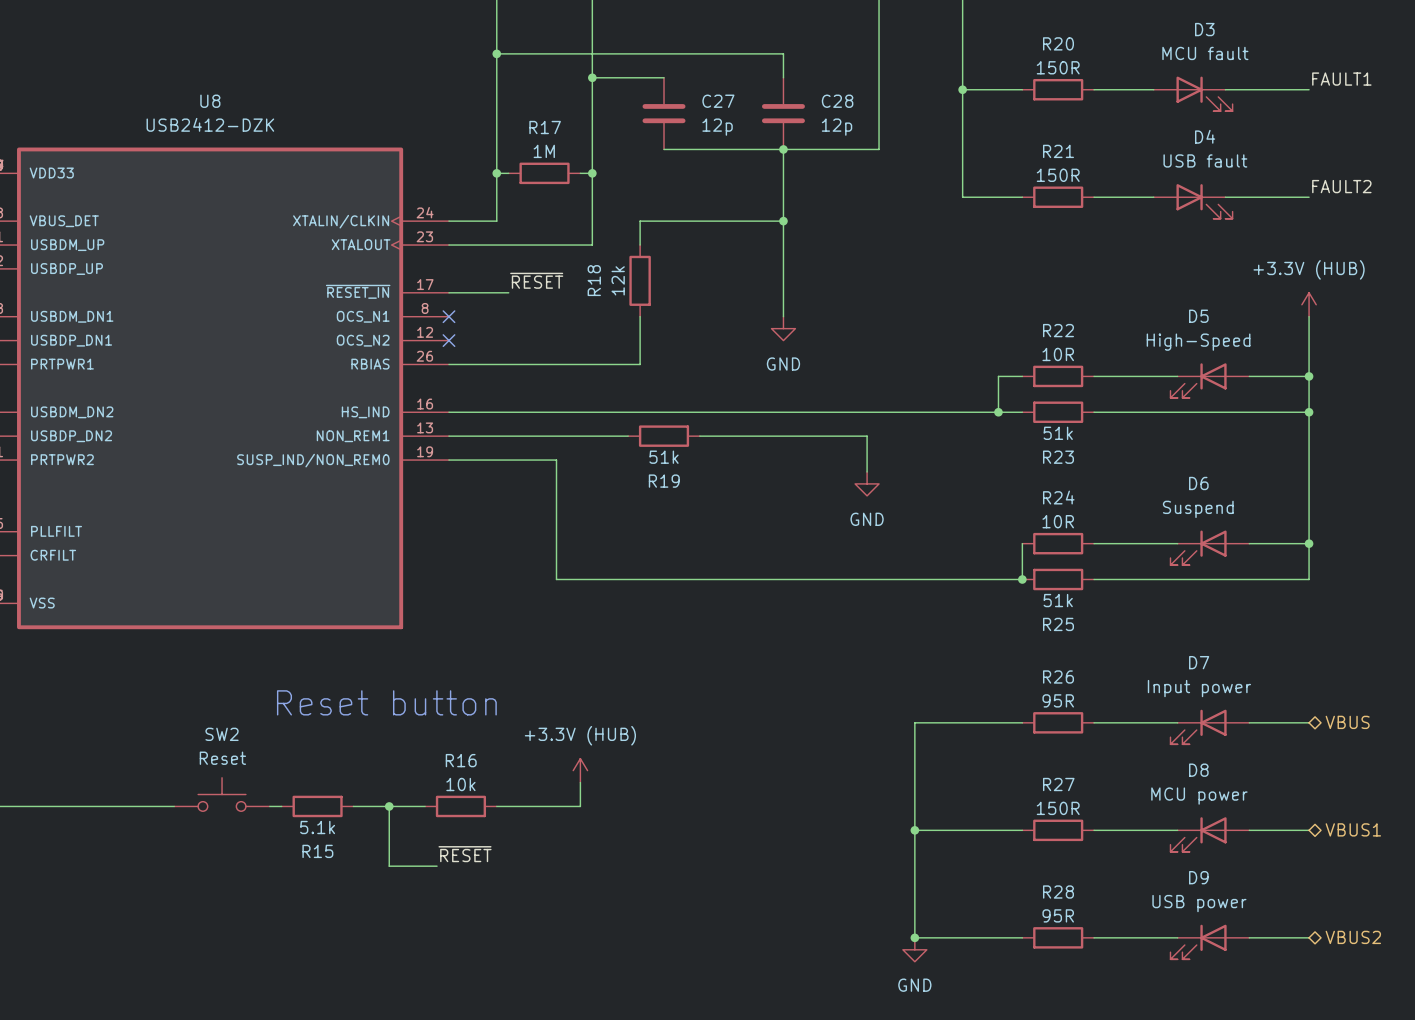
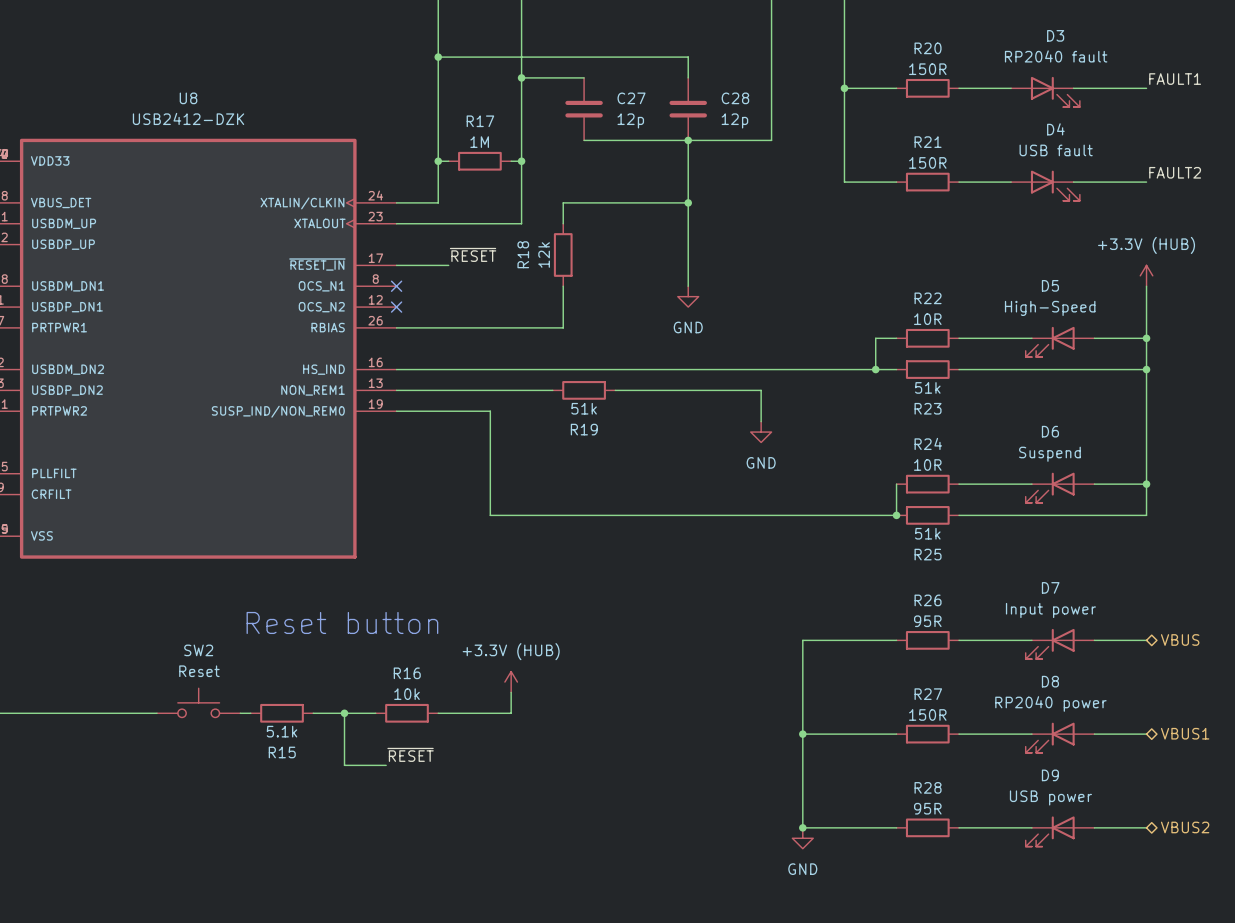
D3 value: MCU fault (1205, 53) -> RP2040 fault (1056, 56)
D8 value: MCU power (1199, 796) -> RP2040 power (1050, 703)

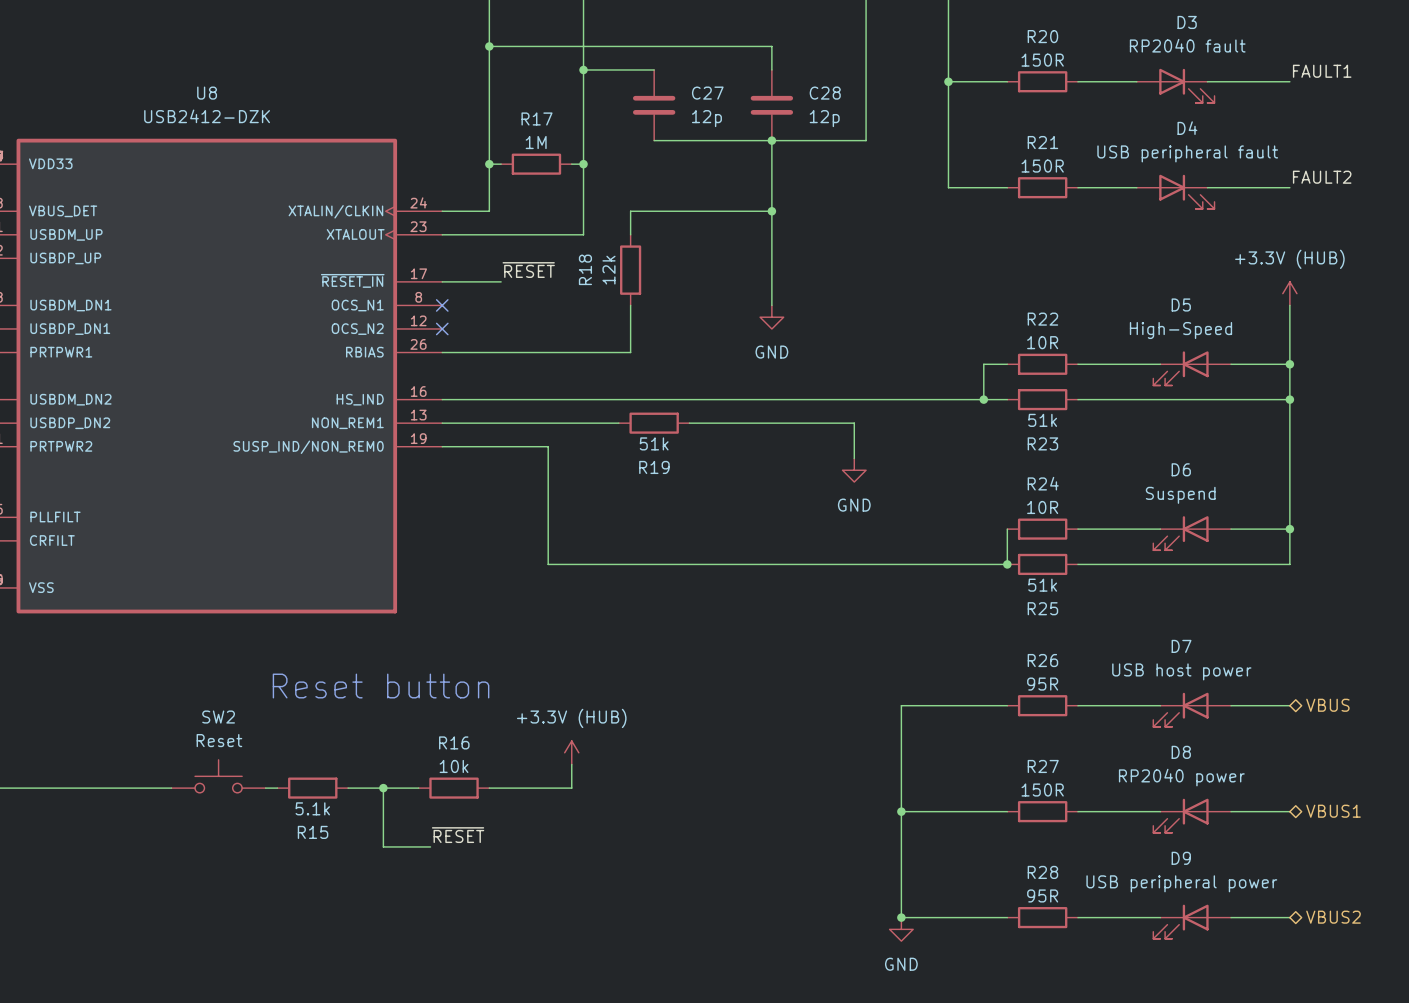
D4 value: USB fault (1056, 150) -> USB peripheral fault (1187, 153)
D7 value: Input power (1050, 610) -> USB host power (1181, 671)
D9 value: USB power (1050, 797) -> USB peripheral power (1181, 883)

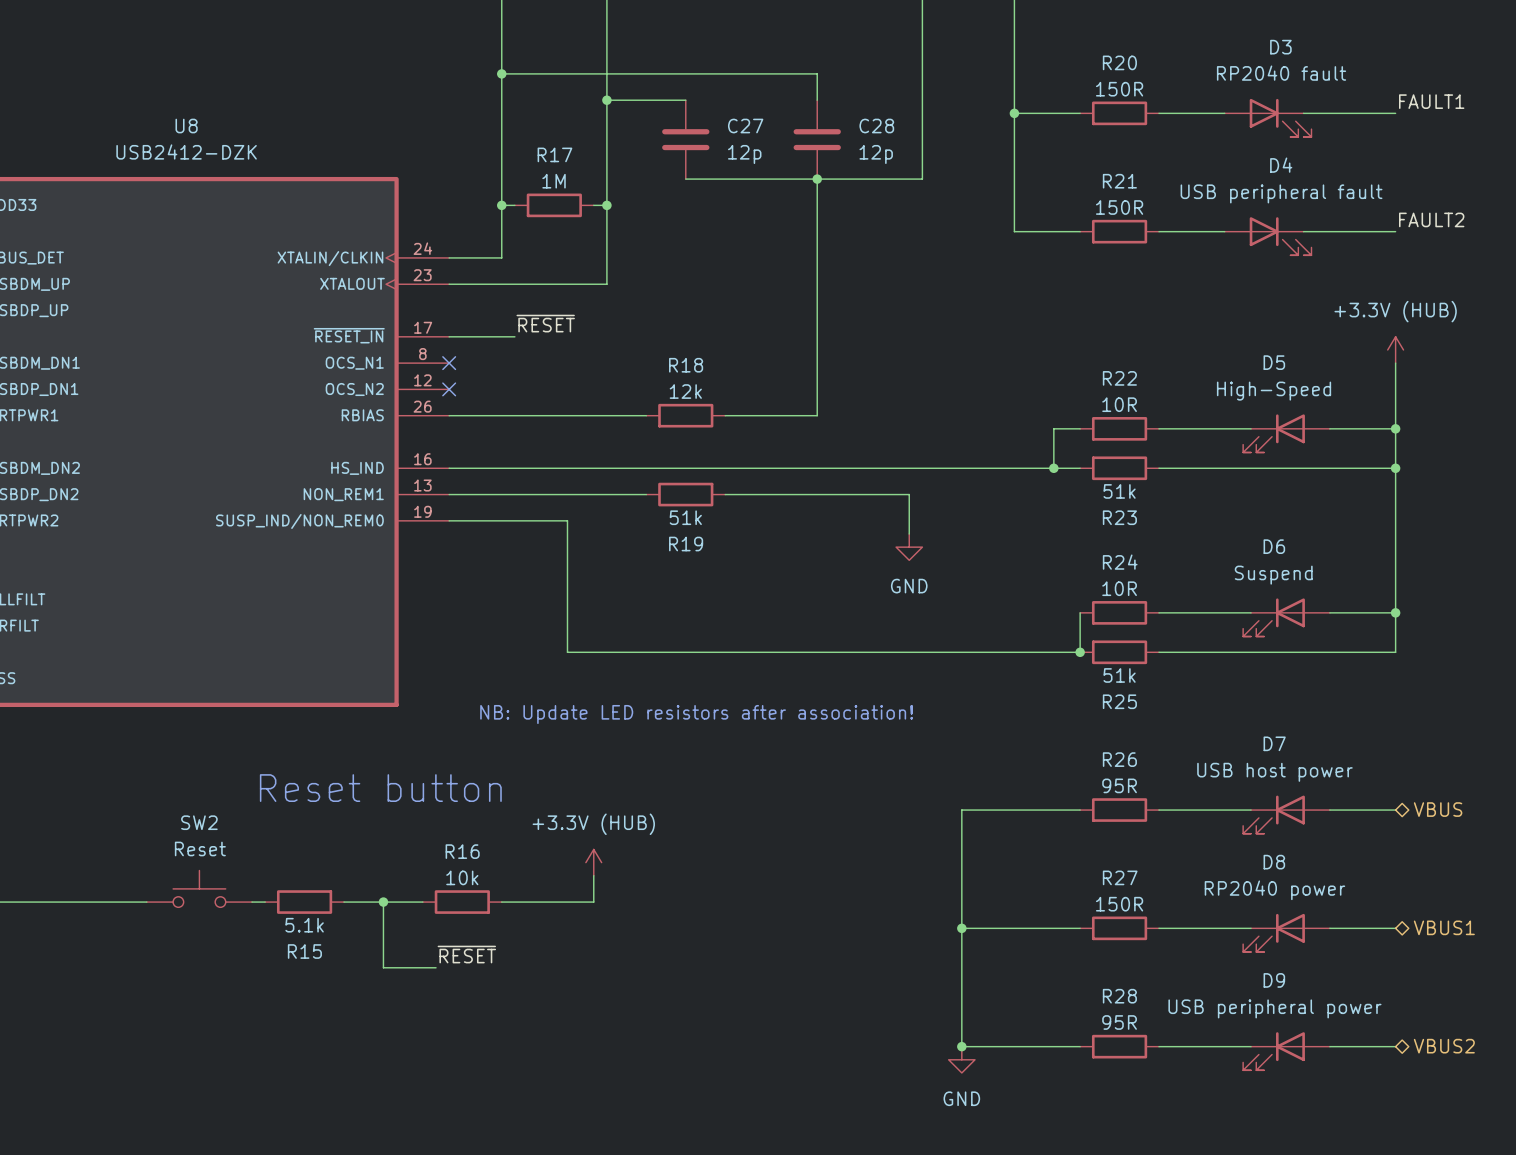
wire: (771, 211) (630, 211) (630, 234) -> none
junction: (771, 211) -> none
R18 rotation: 0° (630, 270) -> 90° clockwise (685, 415)
R18 position: (630, 270) -> (685, 415)
wire: (630, 305) (630, 352) (618, 352) -> none
wire: none -> (817, 363) (817, 415) (725, 415)
power symbol: GND (771, 317) -> none
text: none -> NB: Update LED resistors after association! (696, 714)

